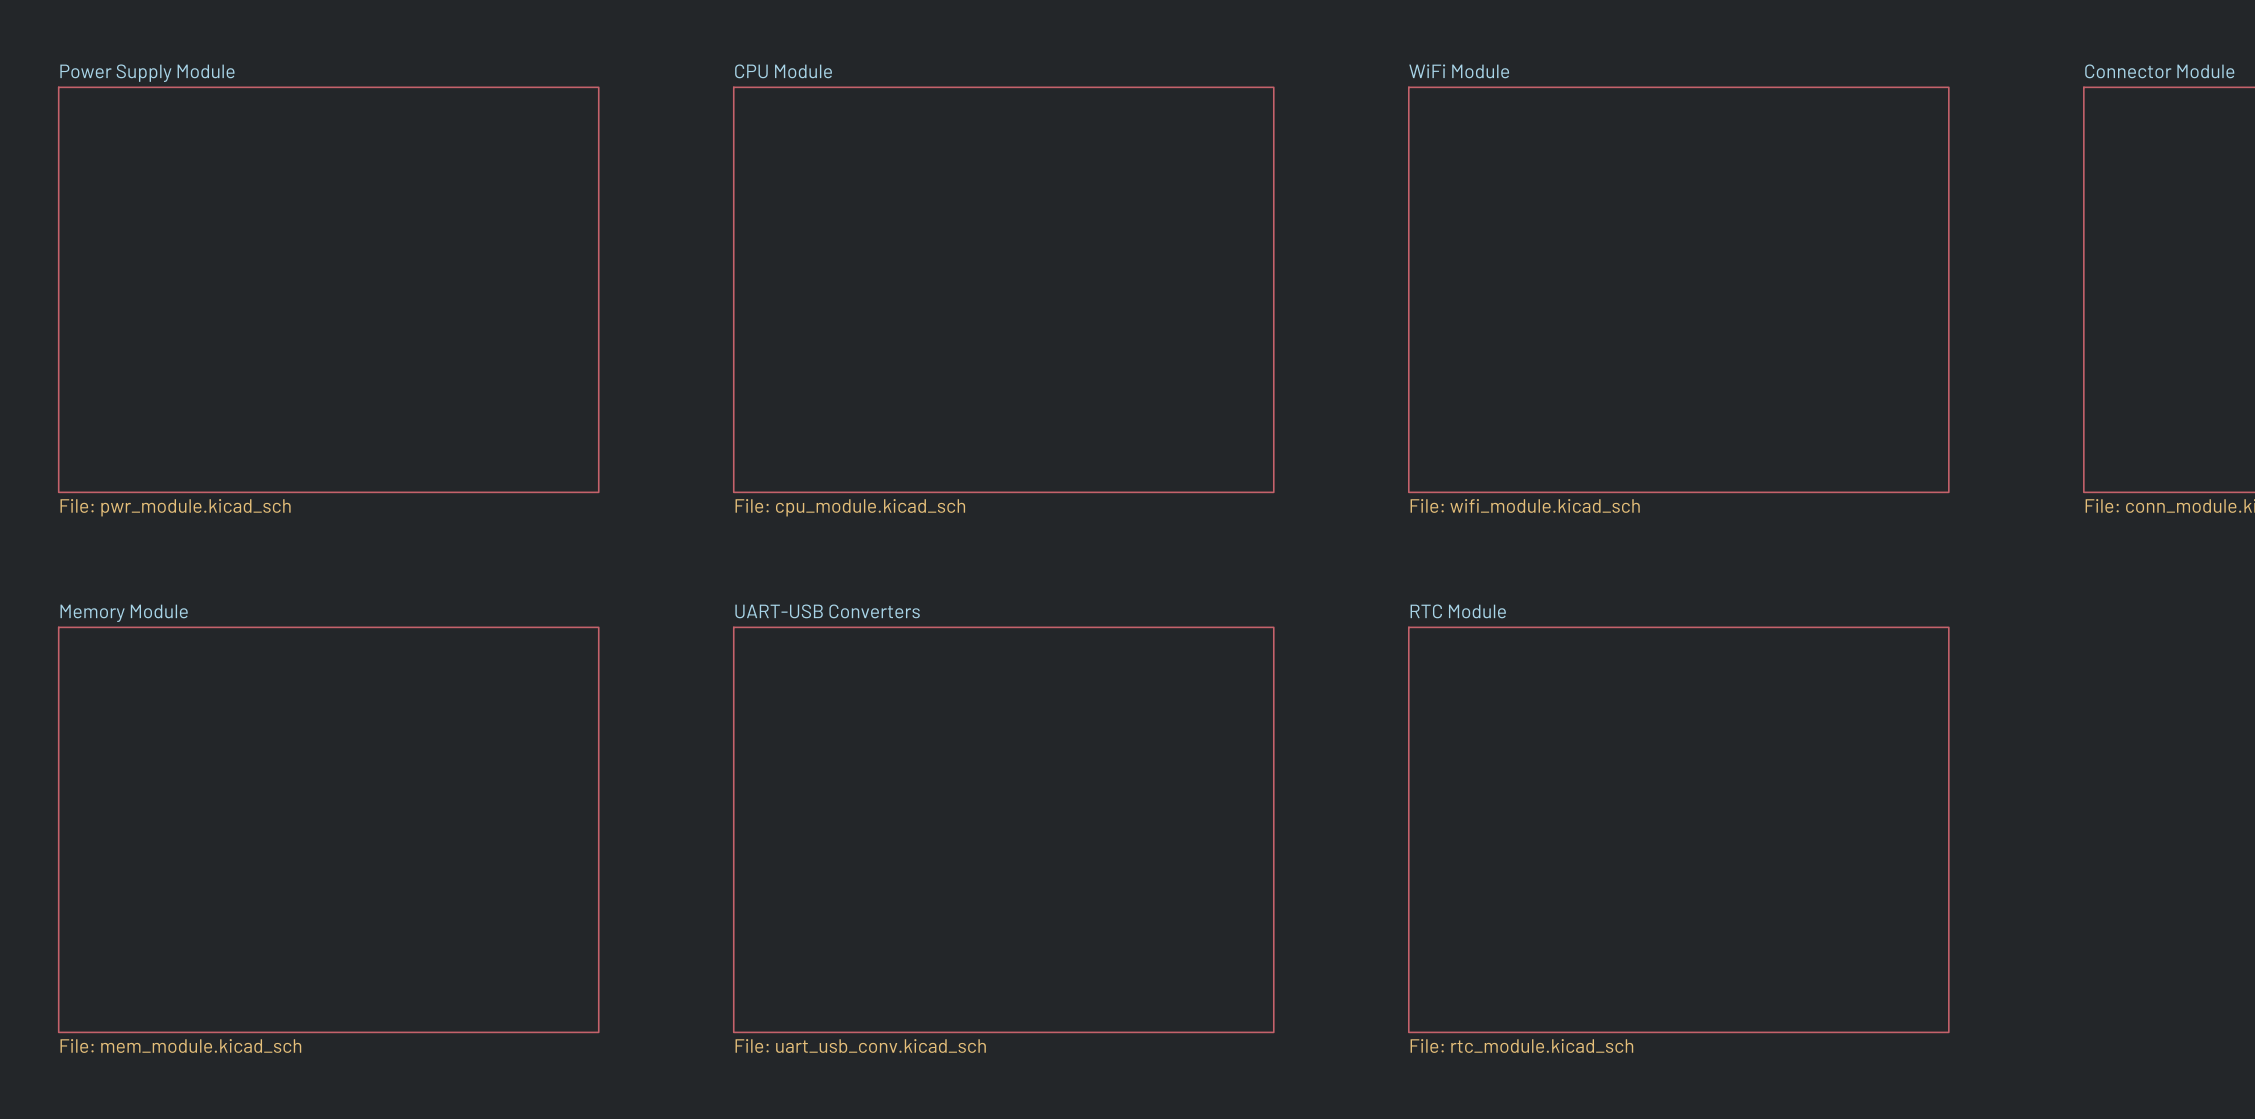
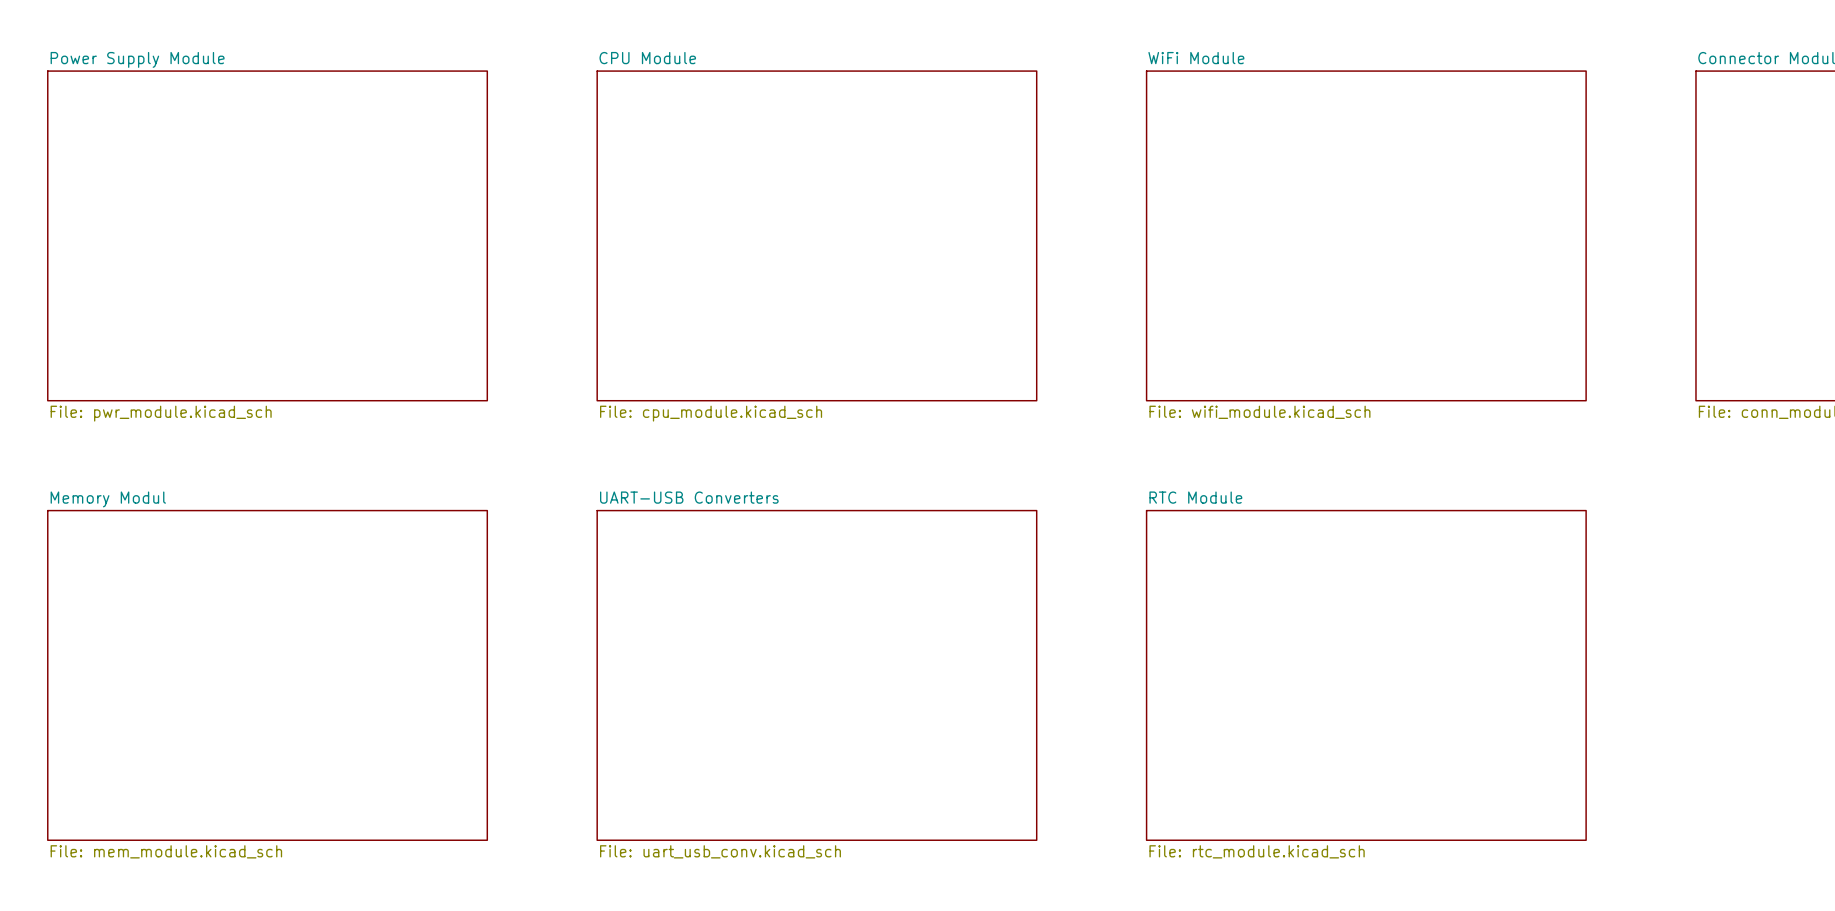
sheet Memory Module name: Memory Module (124, 613) -> Memory Modul (108, 499)

